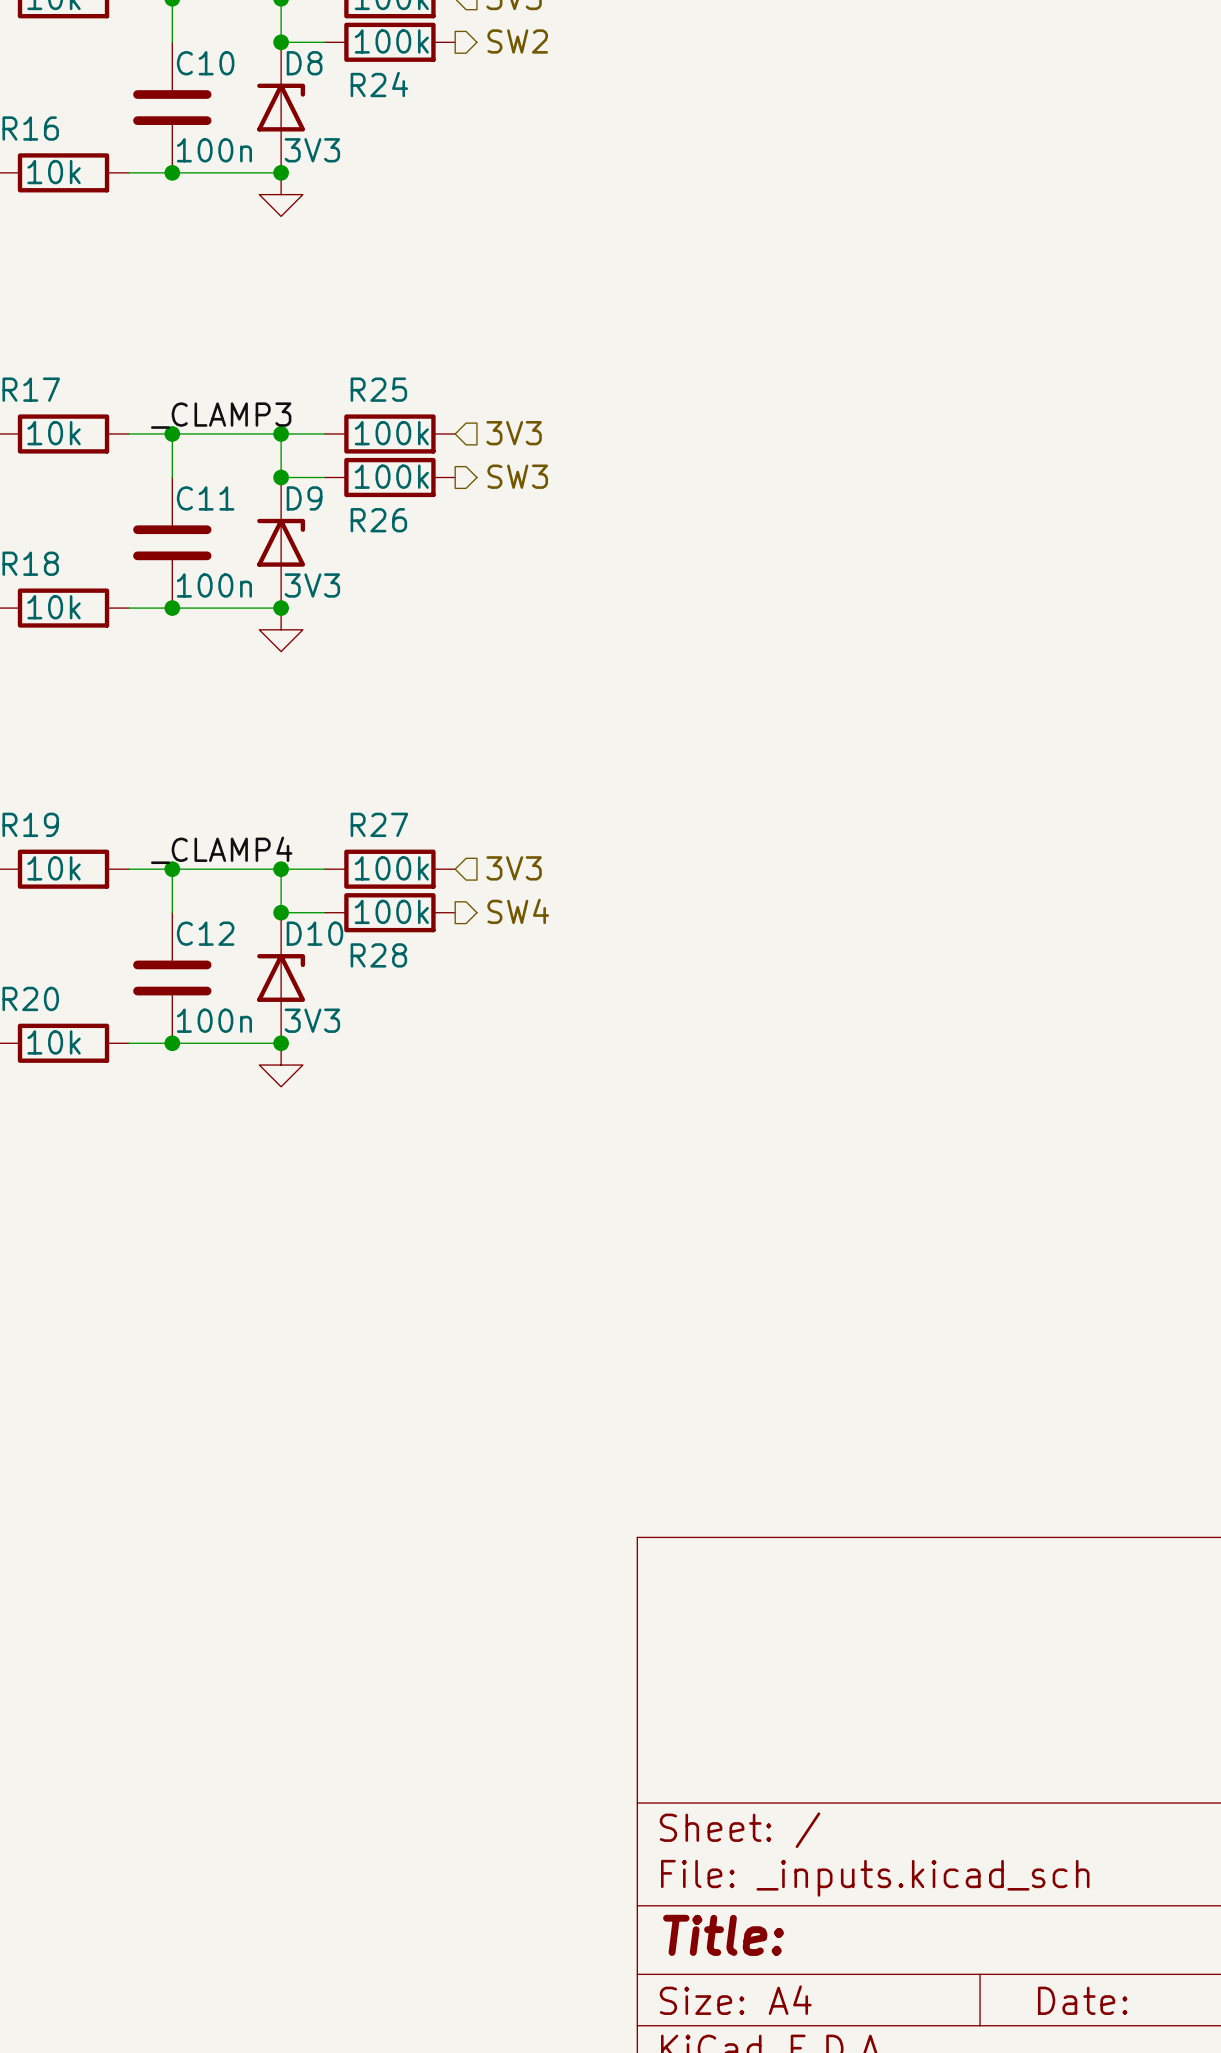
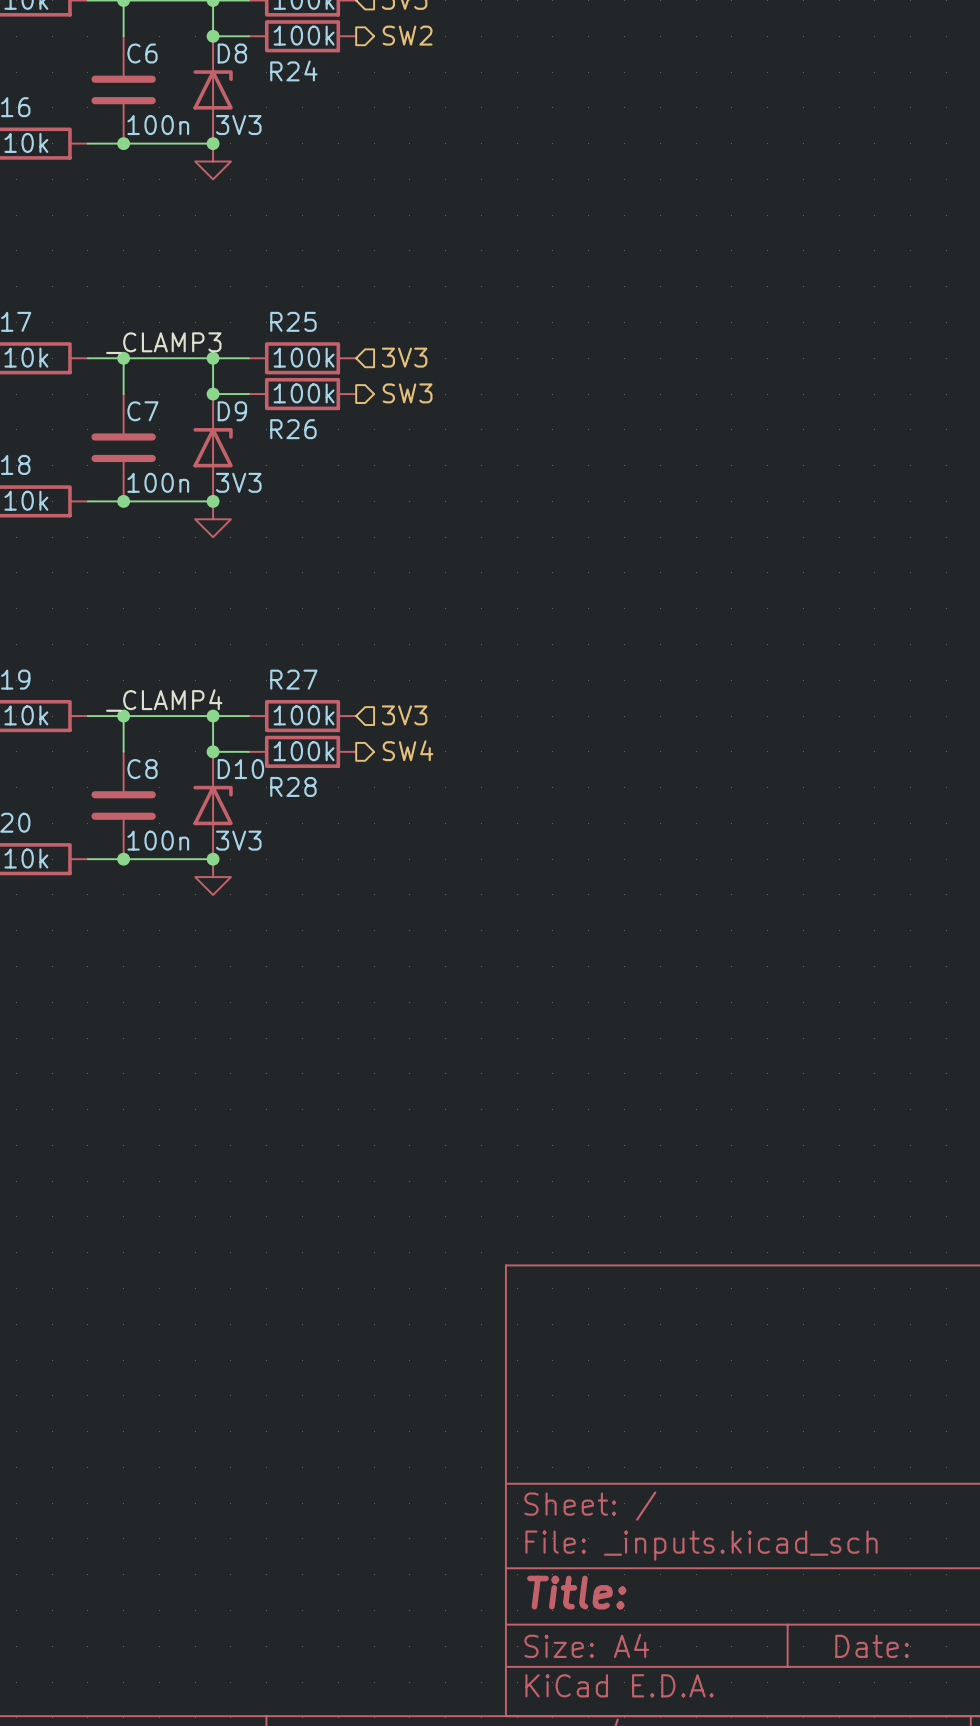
C10 name: C10 (205, 63) -> C6 (142, 53)
C11 name: C11 (205, 498) -> C7 (142, 411)
C12 name: C12 (205, 933) -> C8 (142, 769)

